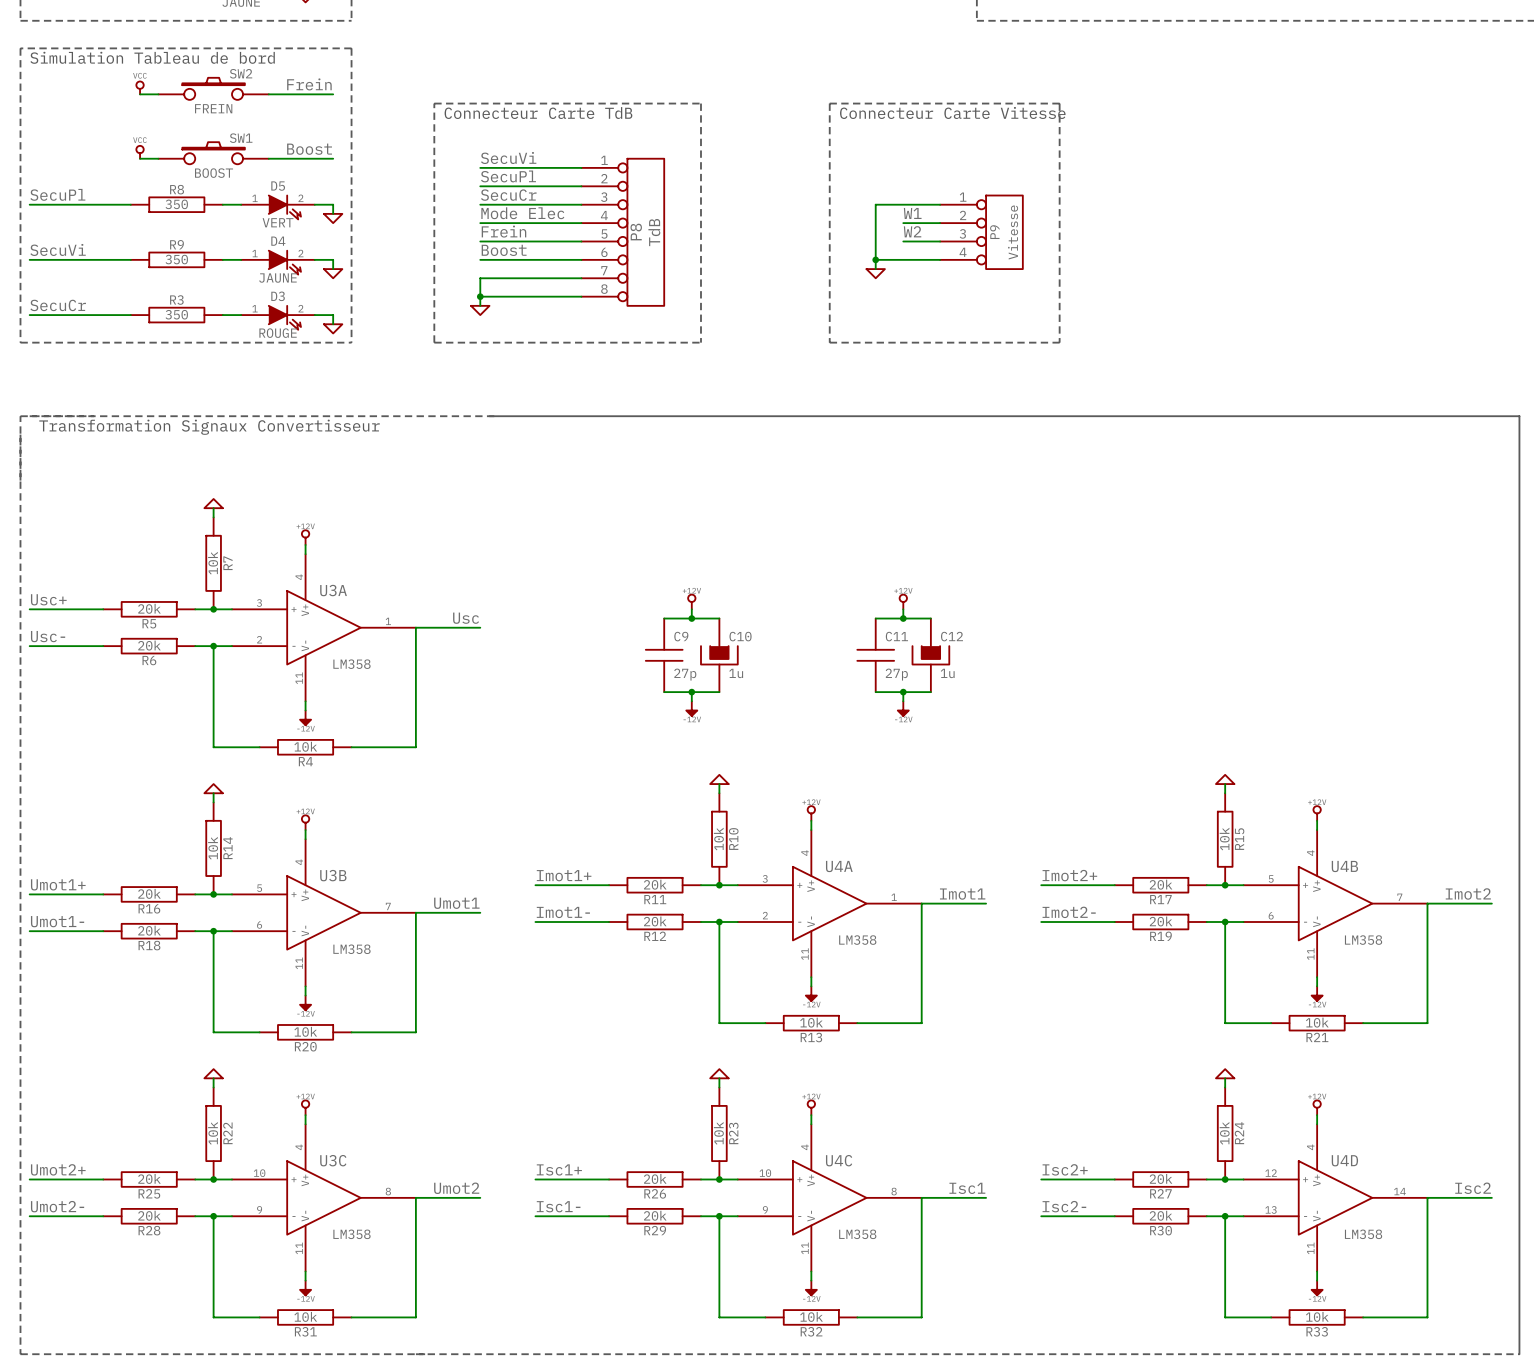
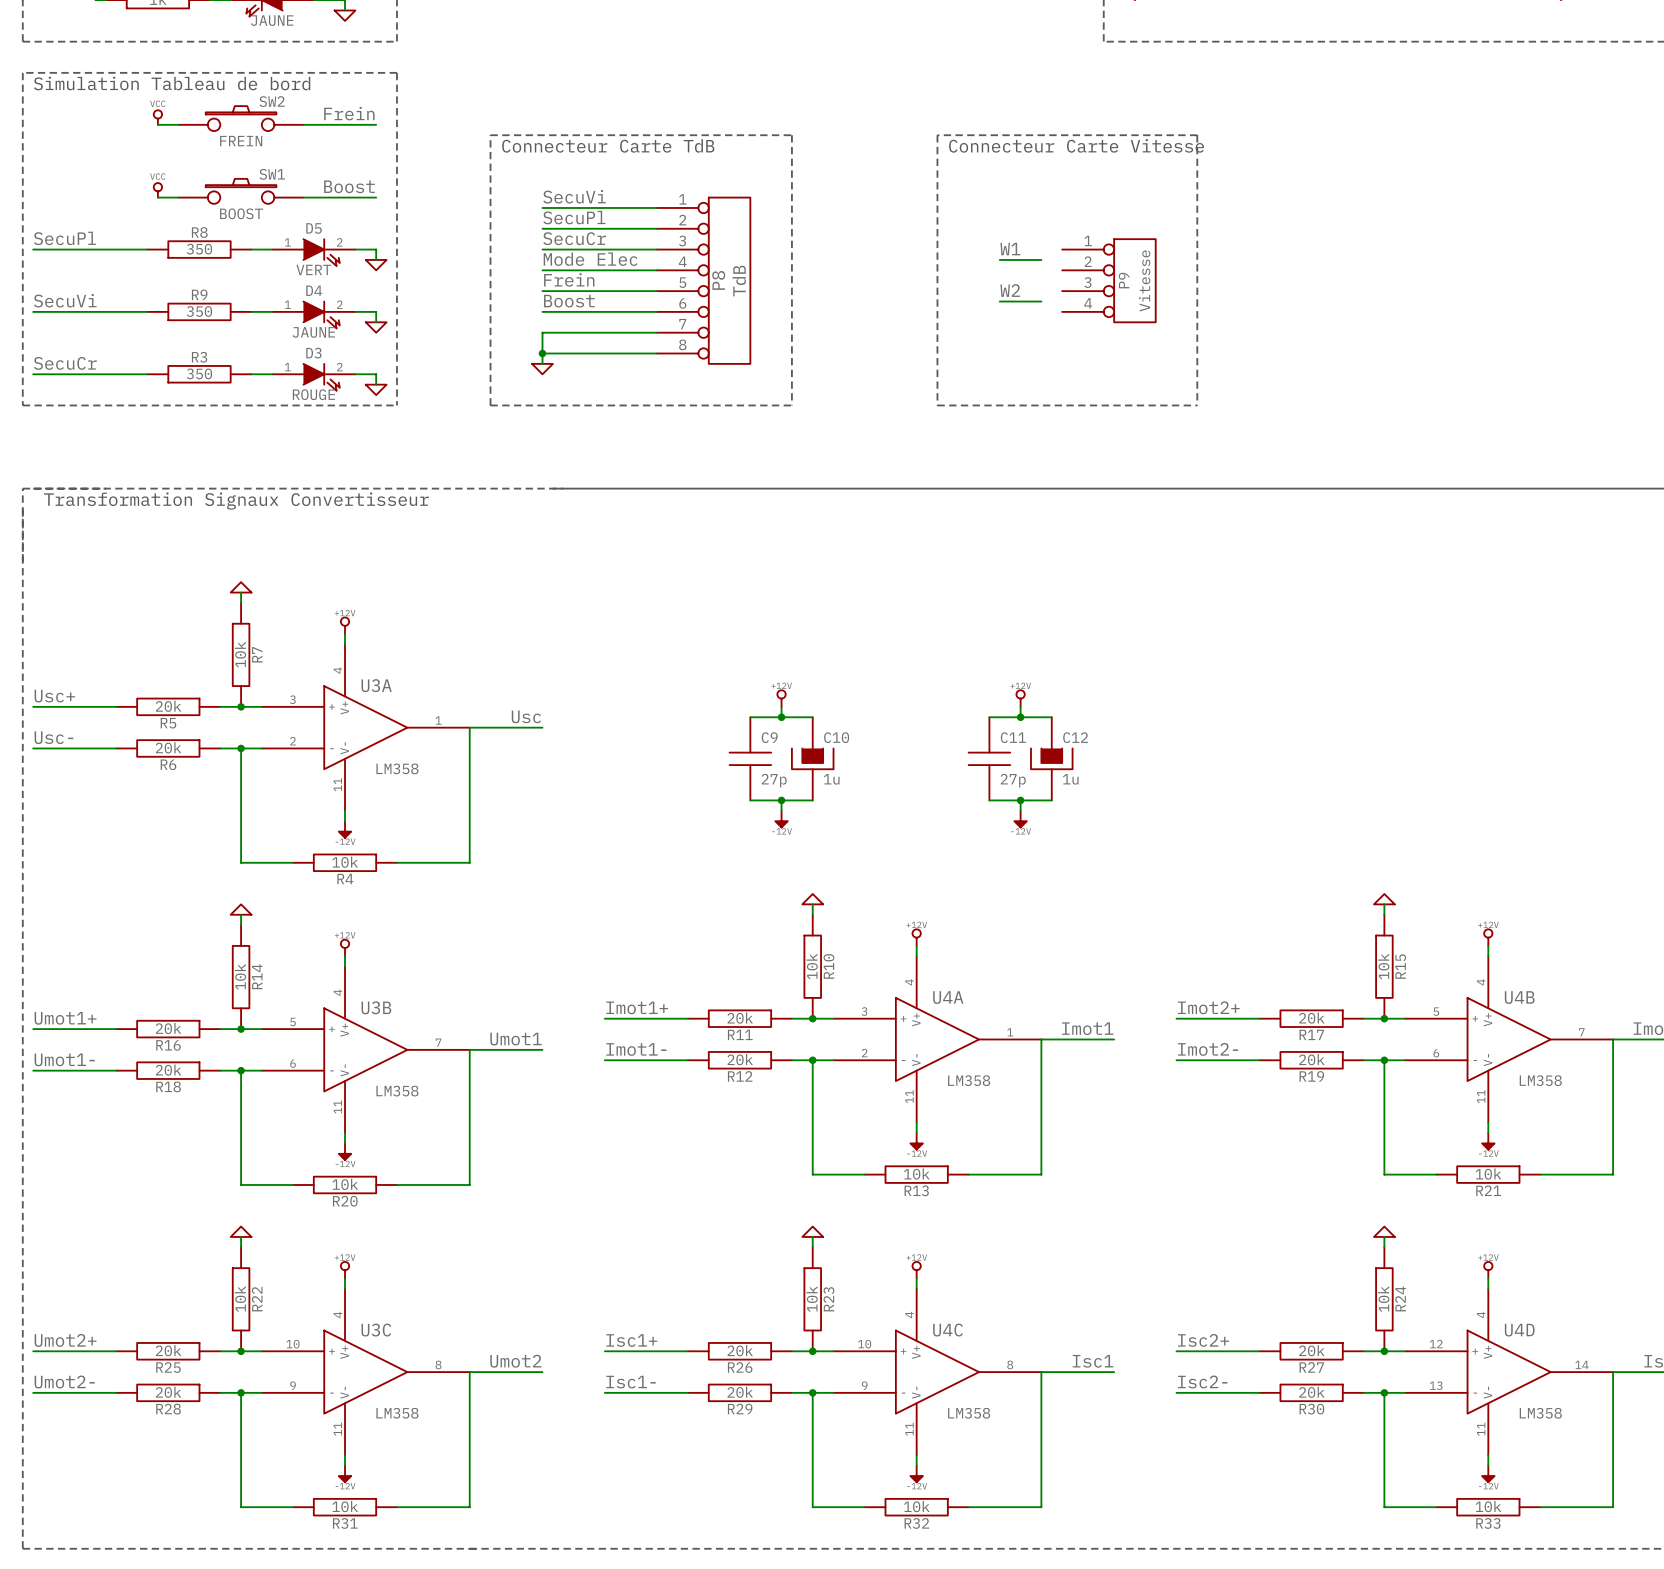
wire: (940, 204) (875, 204) (875, 269) -> none
label position: W1 (912, 213) -> W1 (1010, 249)
wire: (903, 223) (940, 223) -> (999, 259) (1041, 259)
label position: W2 (912, 231) -> W2 (1010, 290)
wire: (903, 241) (940, 241) -> (999, 301) (1041, 301)
wire: (875, 259) (940, 259) -> none
junction: (875, 259) -> none
power symbol: (875, 273) -> none

